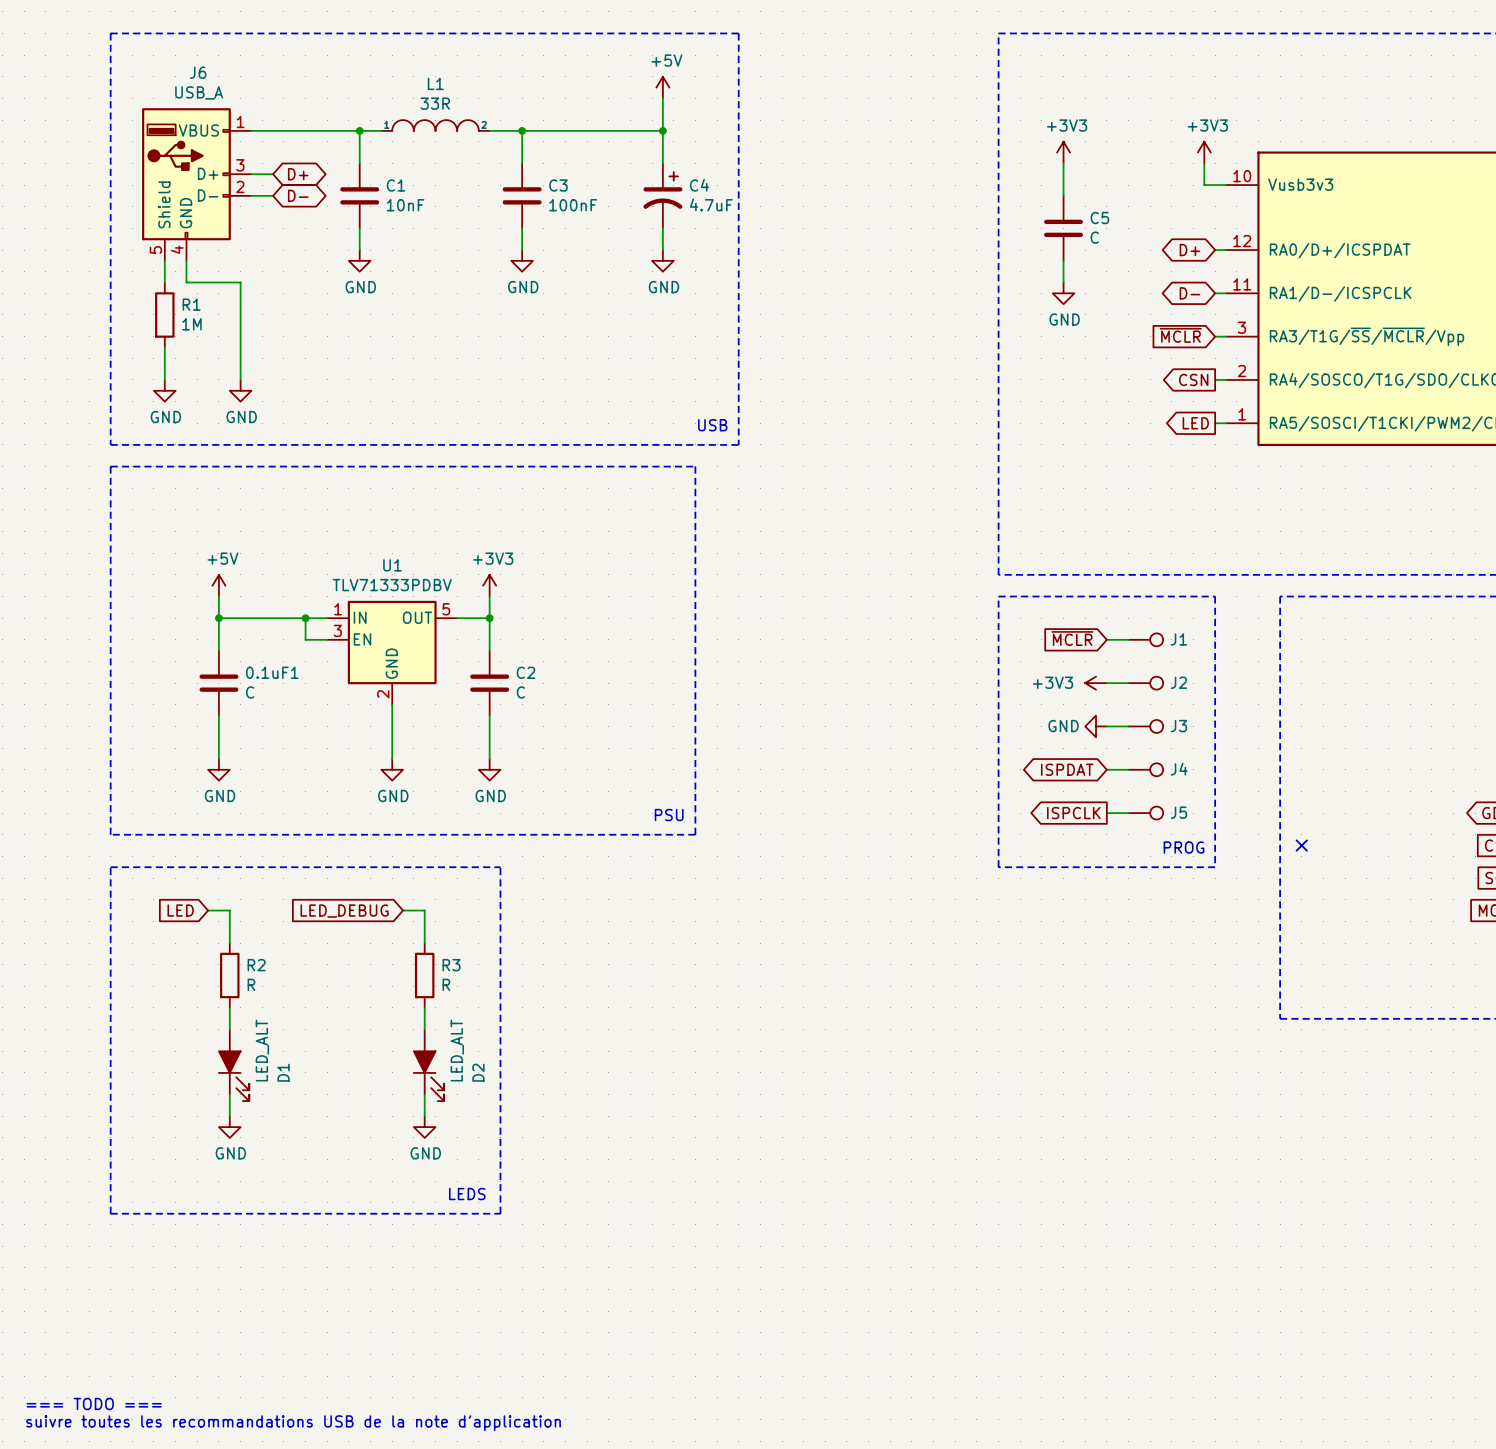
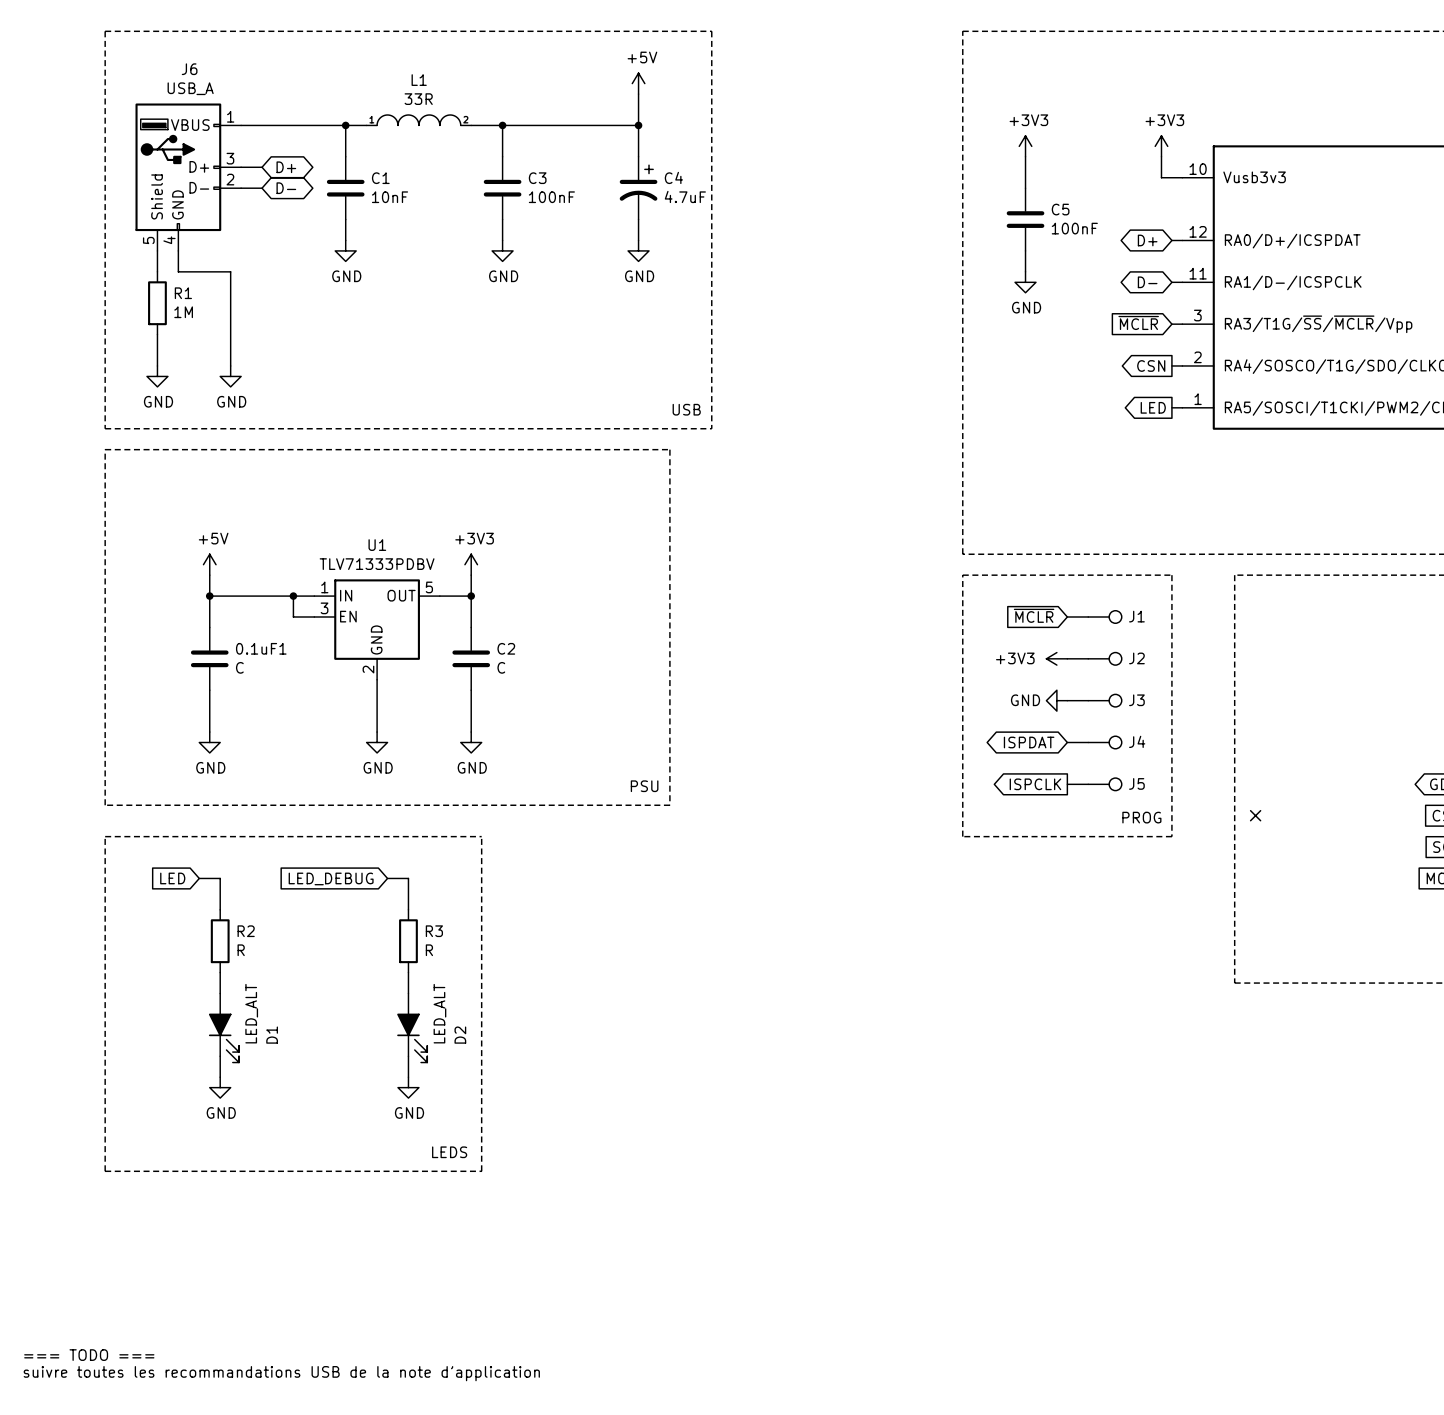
C5 value: C (1094, 237) -> 100nF (1074, 228)

